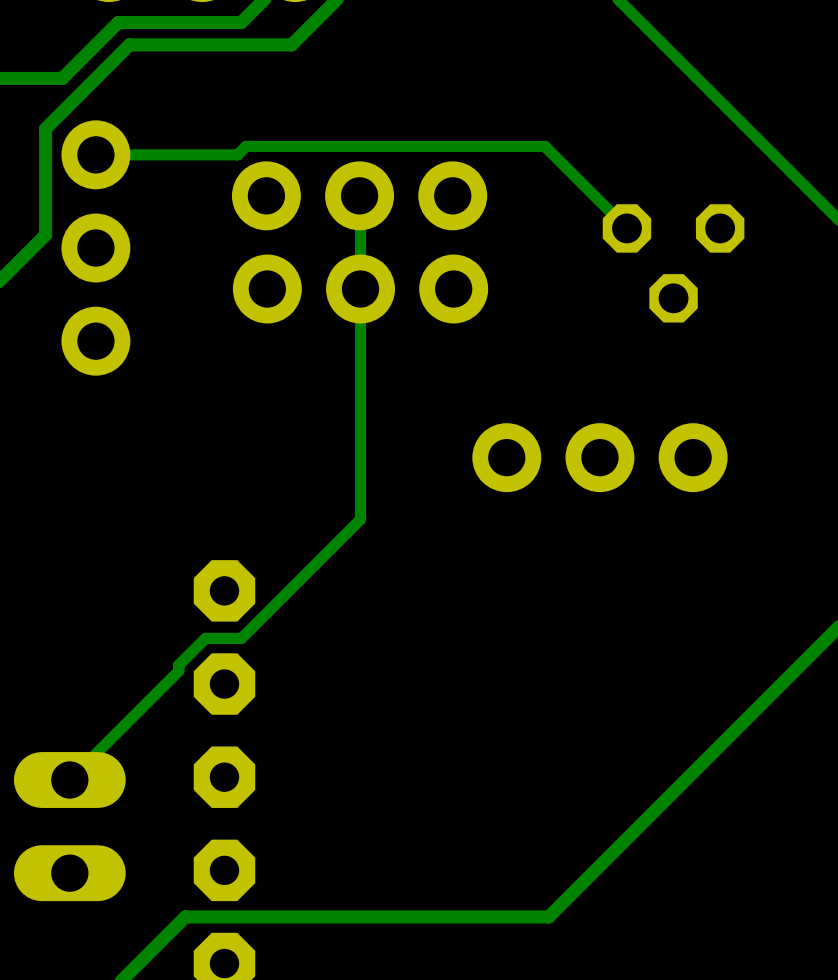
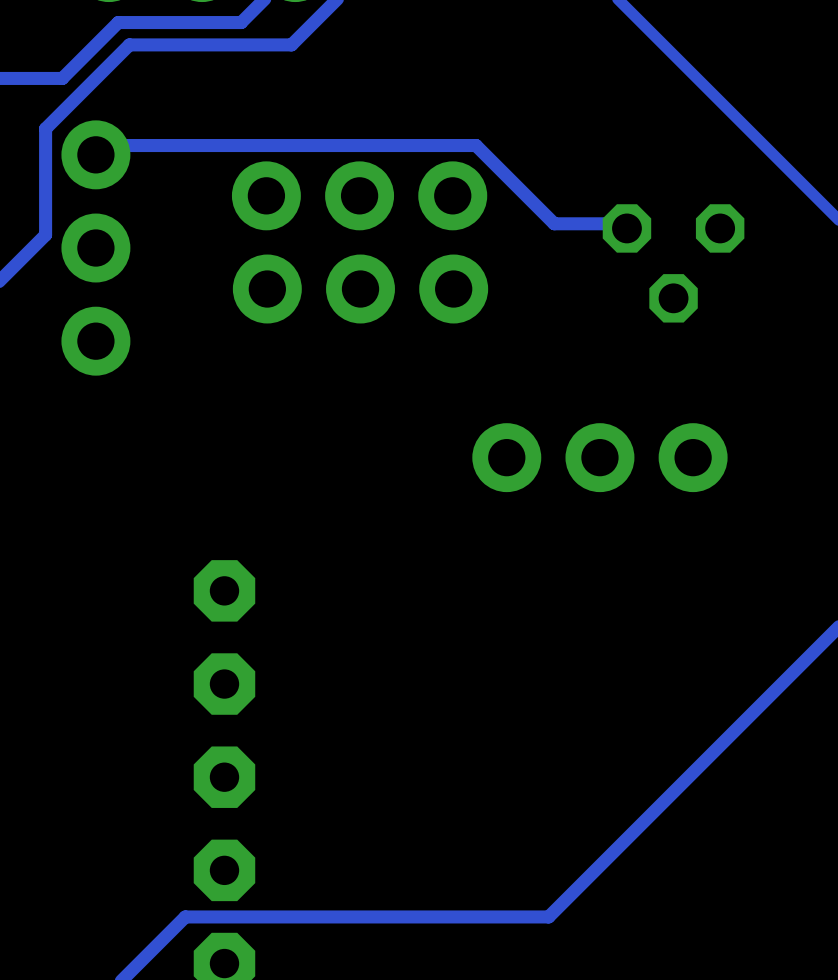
track: (95, 154) (237, 154) (245, 146) (544, 146) (626, 228) -> (95, 154) (95, 151) (101, 145) (476, 145) (554, 223) (626, 223) (626, 228)
track: (359, 195) (360, 519) (241, 638) (205, 638) (178, 665) (178, 670) (69, 780) -> none
part: (69, 826) -> none

